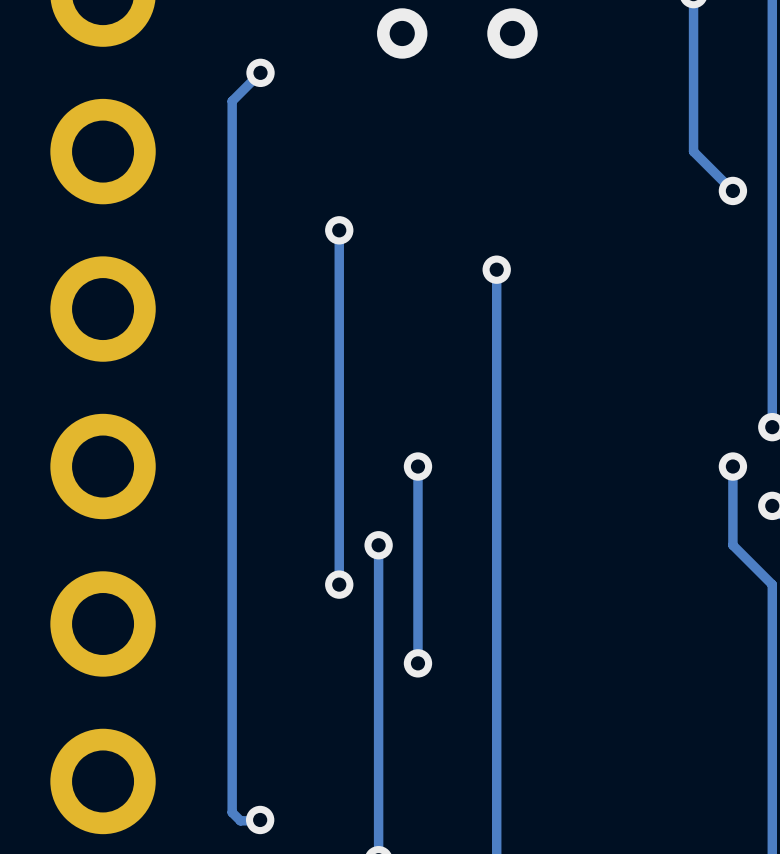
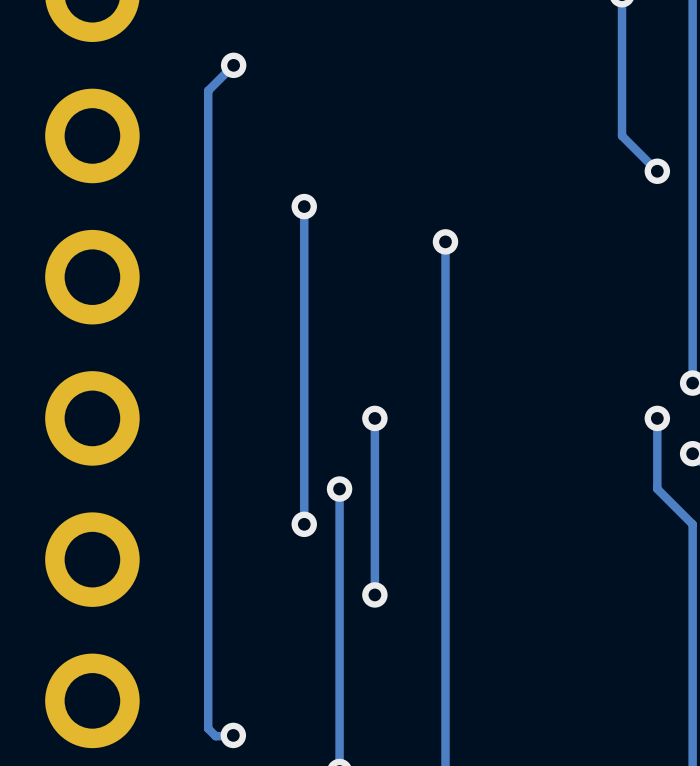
via: (402, 33) -> none
via: (512, 33) -> none

